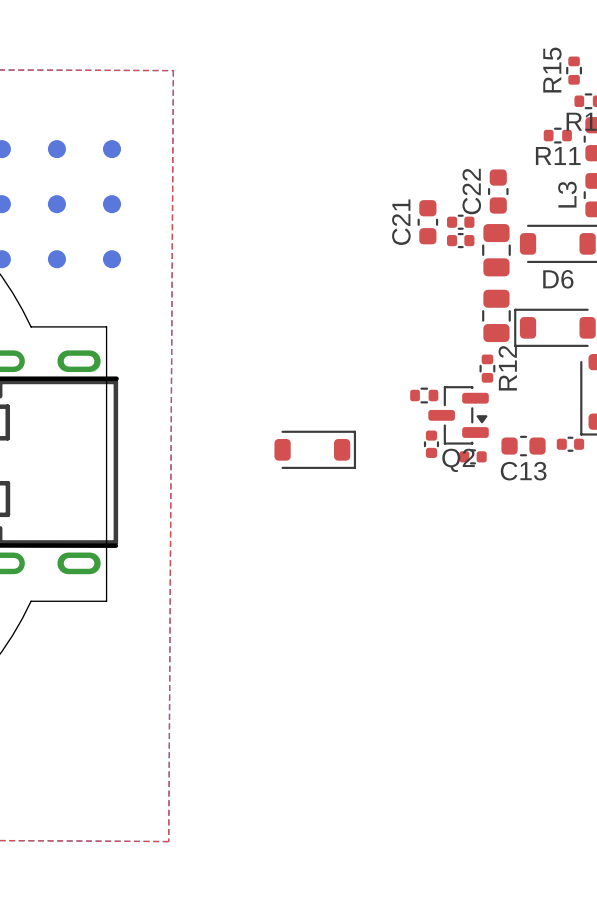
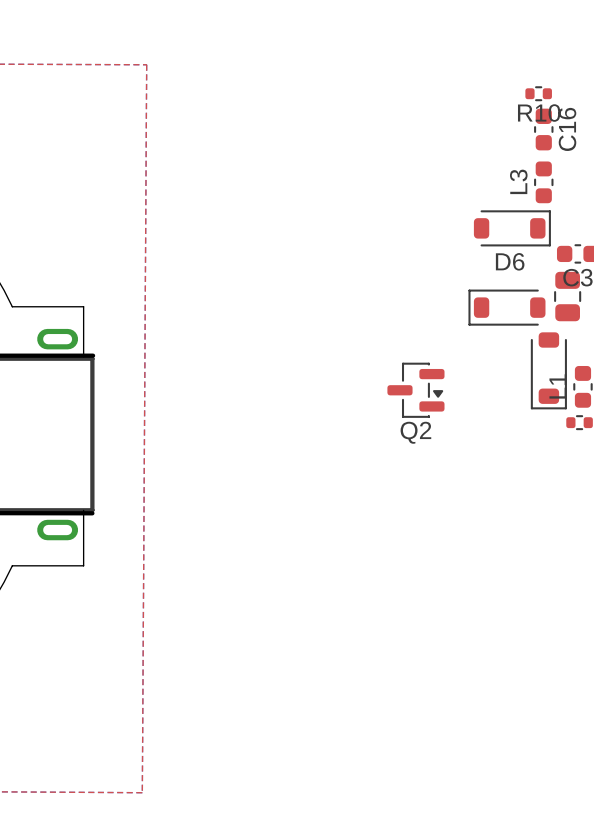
R15: (574, 70) -> none
R11: (557, 135) -> none
part: (56, 149) -> none
part: (111, 149) -> none
C22: (498, 191) -> none
part: (56, 204) -> none
part: (111, 204) -> none
C21: (427, 222) -> none
part: (460, 222) -> none
part: (460, 240) -> none
part: (496, 250) -> none
part: (56, 259) -> none
part: (111, 259) -> none
part: (496, 315) -> none
R12: (487, 368) -> none
board edge: (106, 380) (106, 542) -> none
part: (424, 395) -> none
part: (431, 444) -> none
part: (570, 444) -> none
C13: (523, 446) -> none
part: (315, 449) -> none
part: (472, 456) -> none

